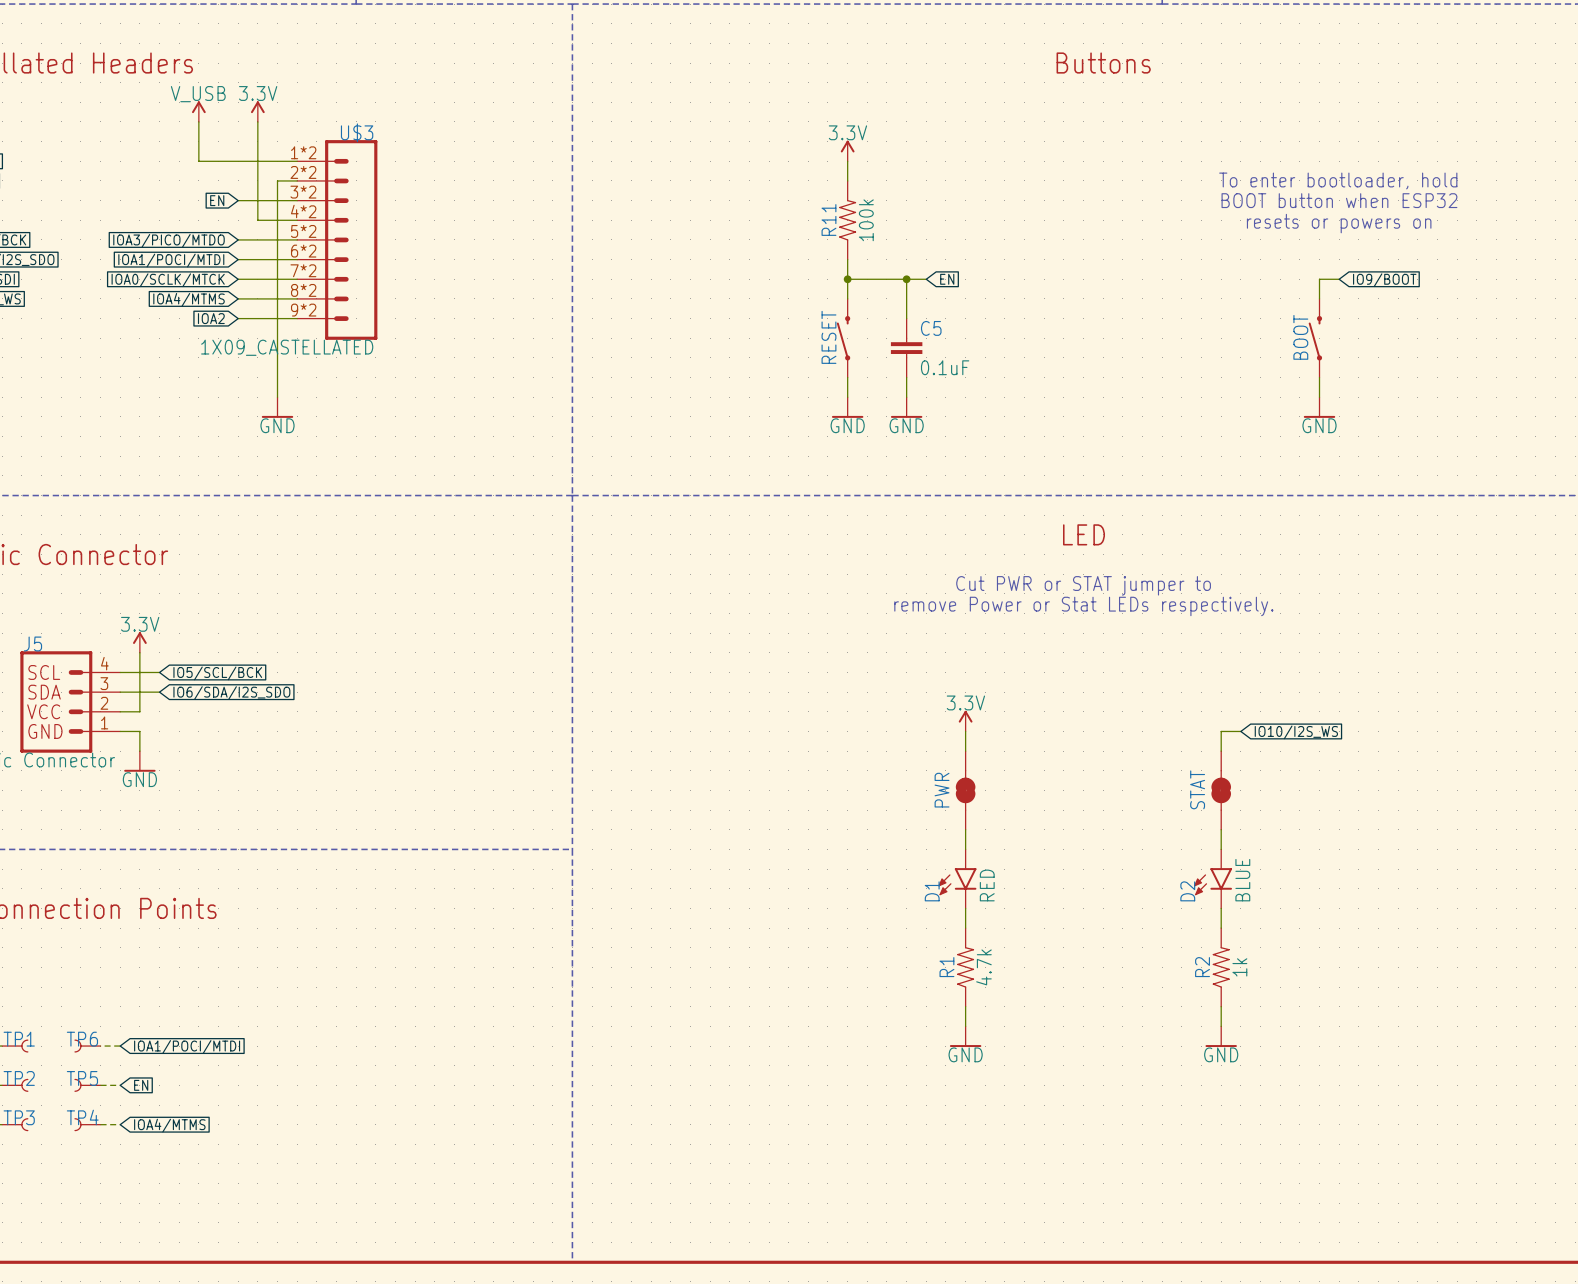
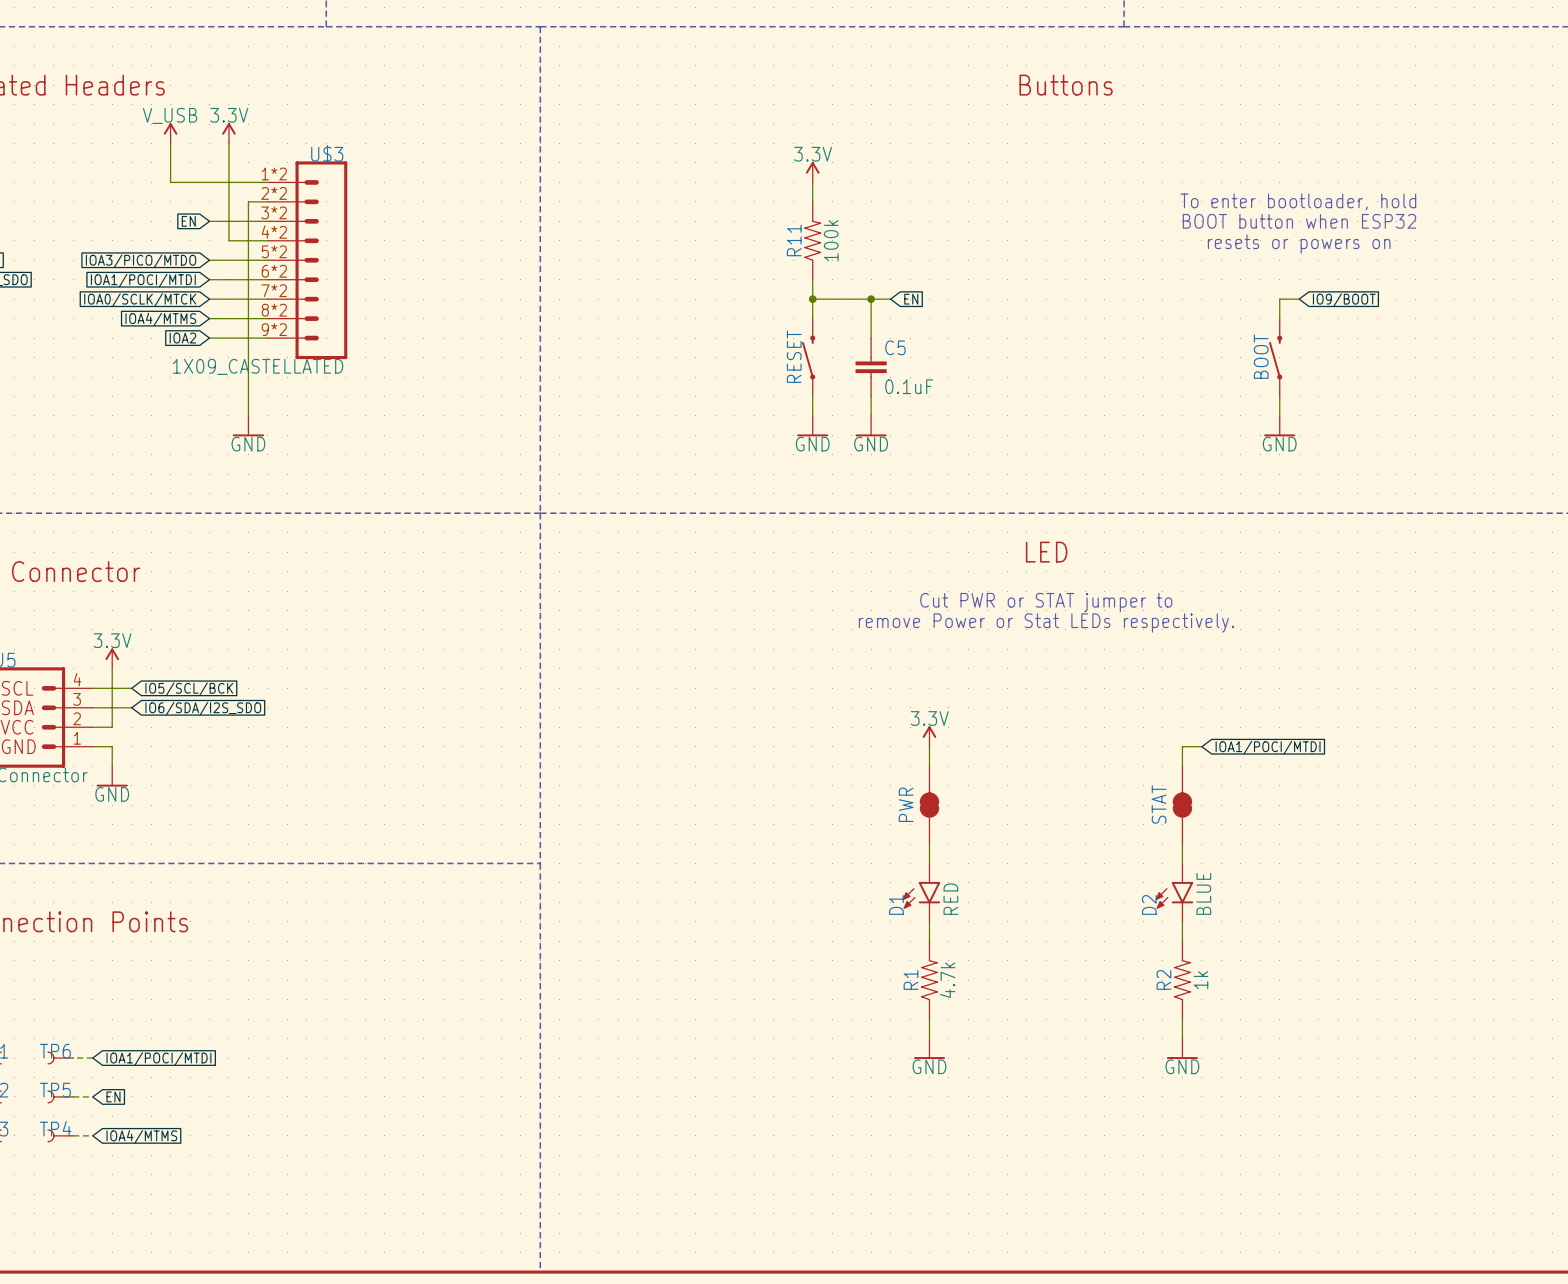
global label: IO10/I2S_WS (1296, 732) -> IOA1/POCI/MTDI (1268, 747)

